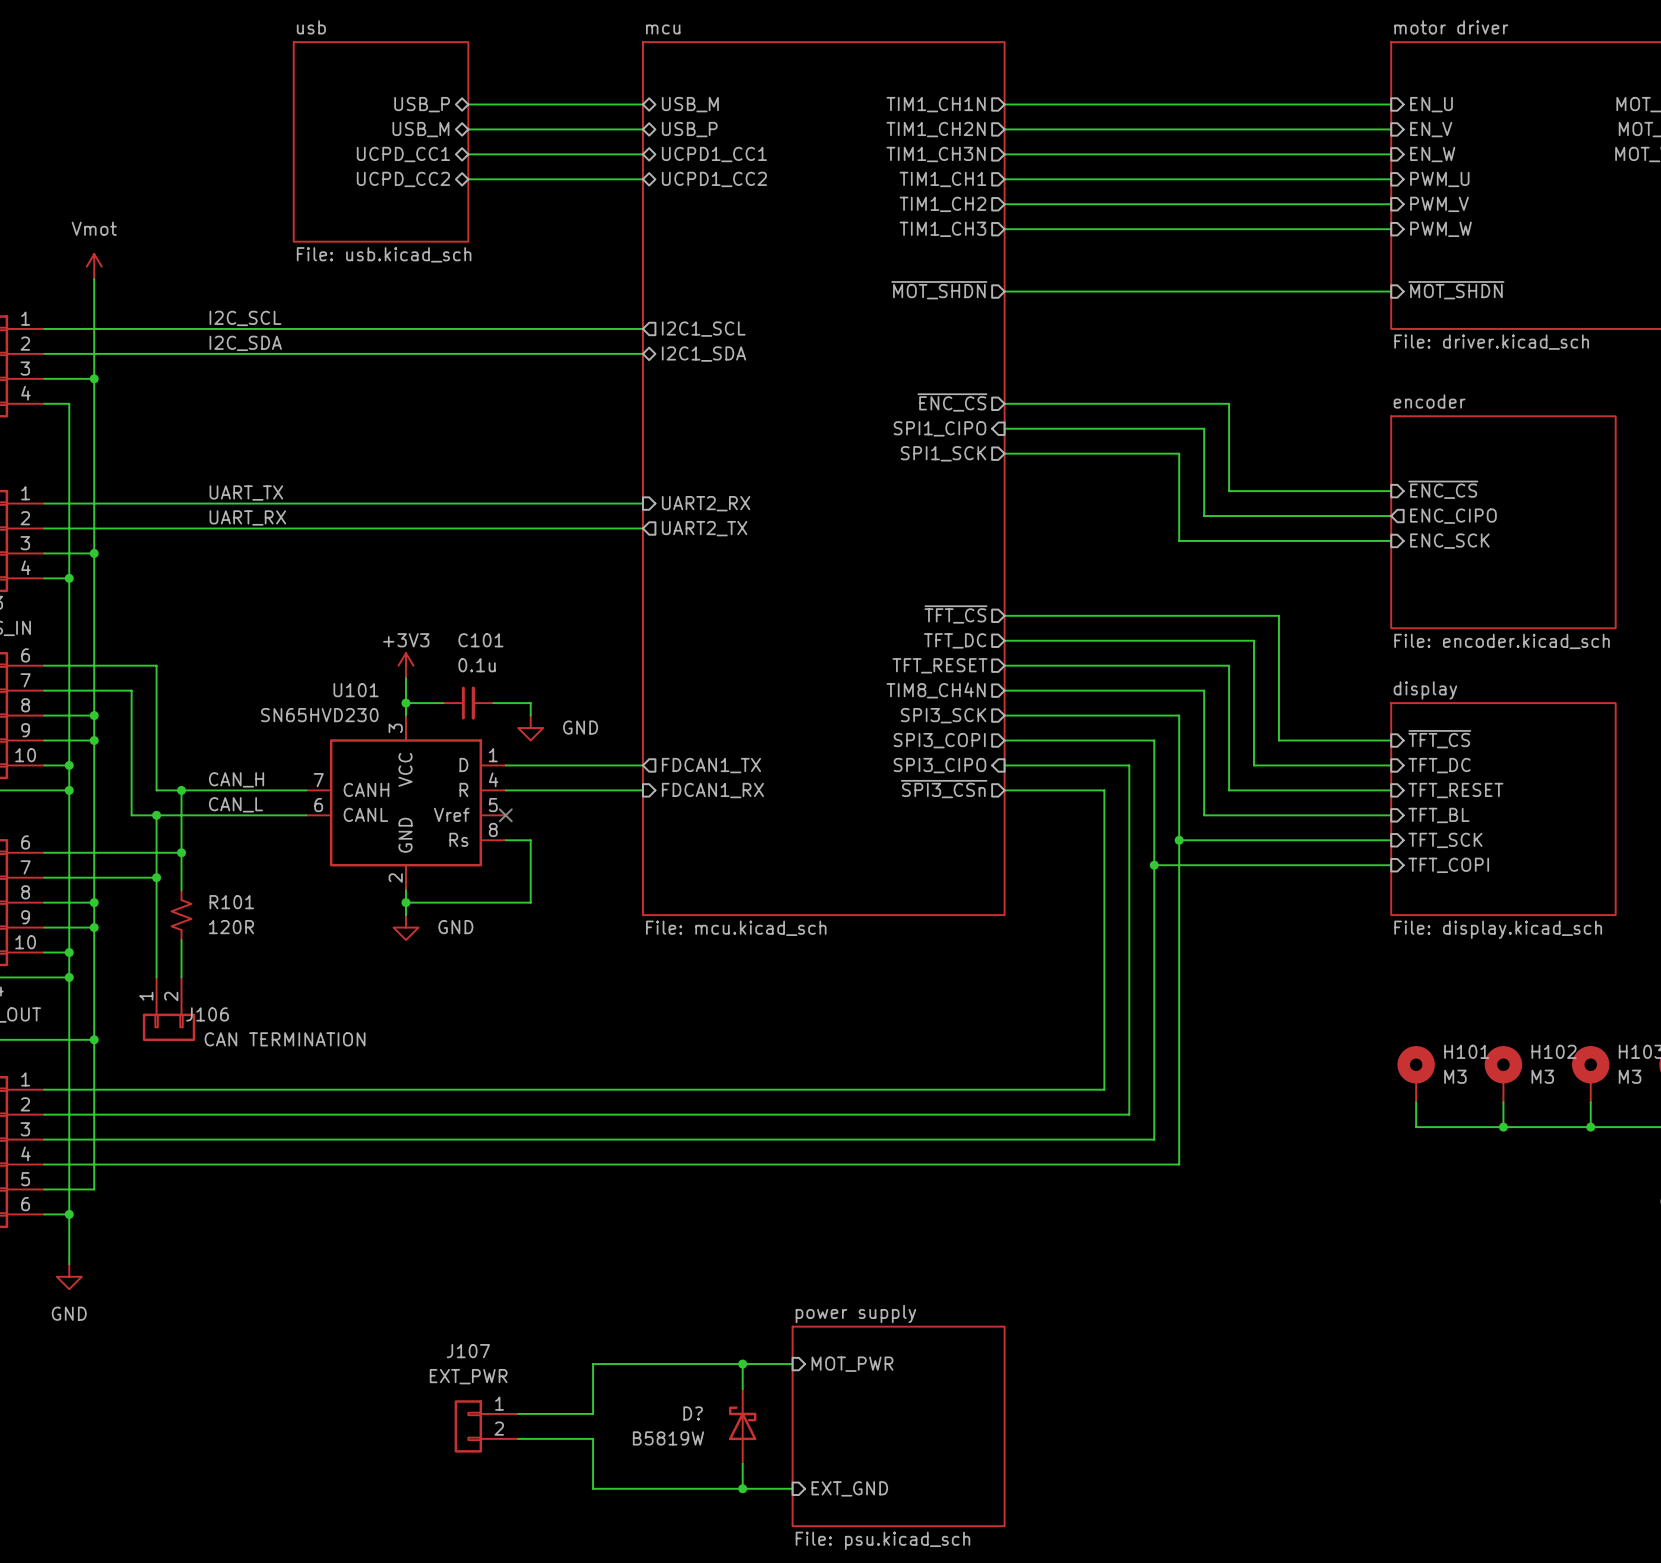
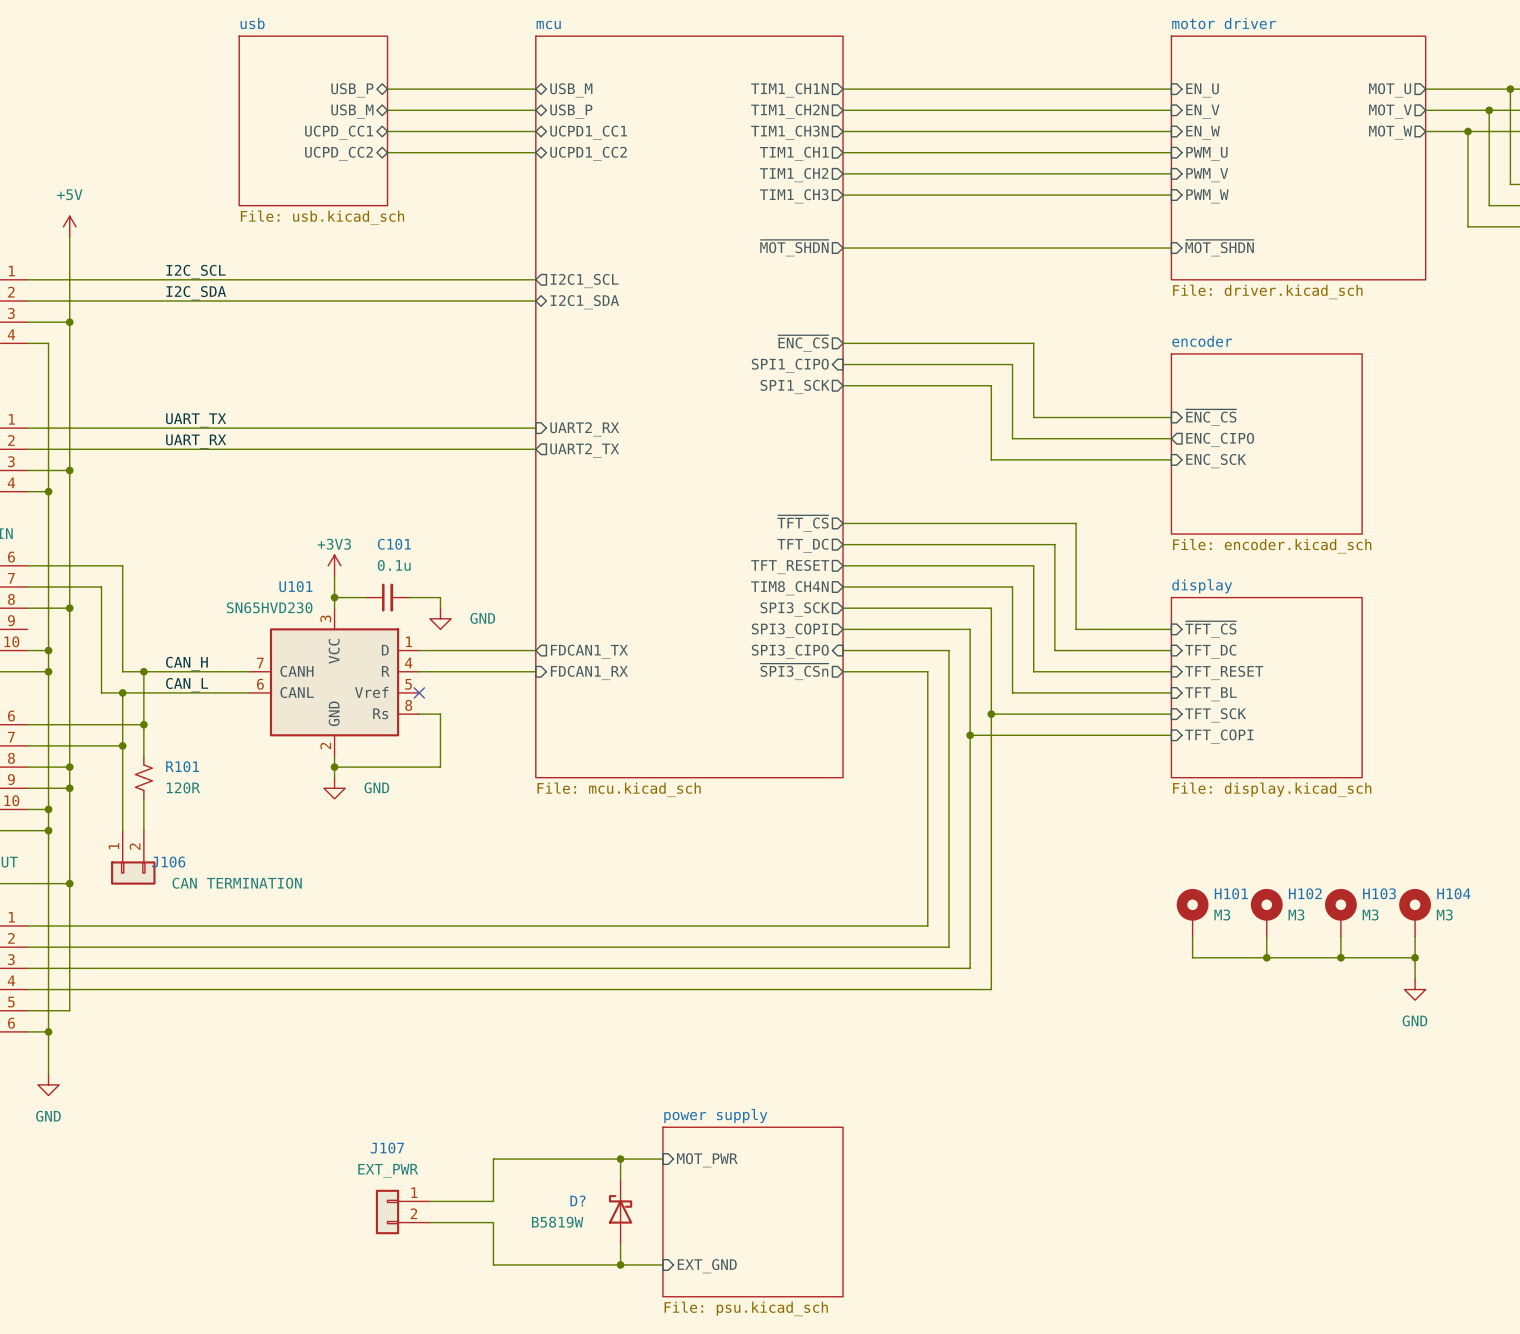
power symbol: Vmot (94, 266) -> +5V (69, 226)
wire: (44, 740) (94, 740) -> none
junction: (94, 740) -> none

